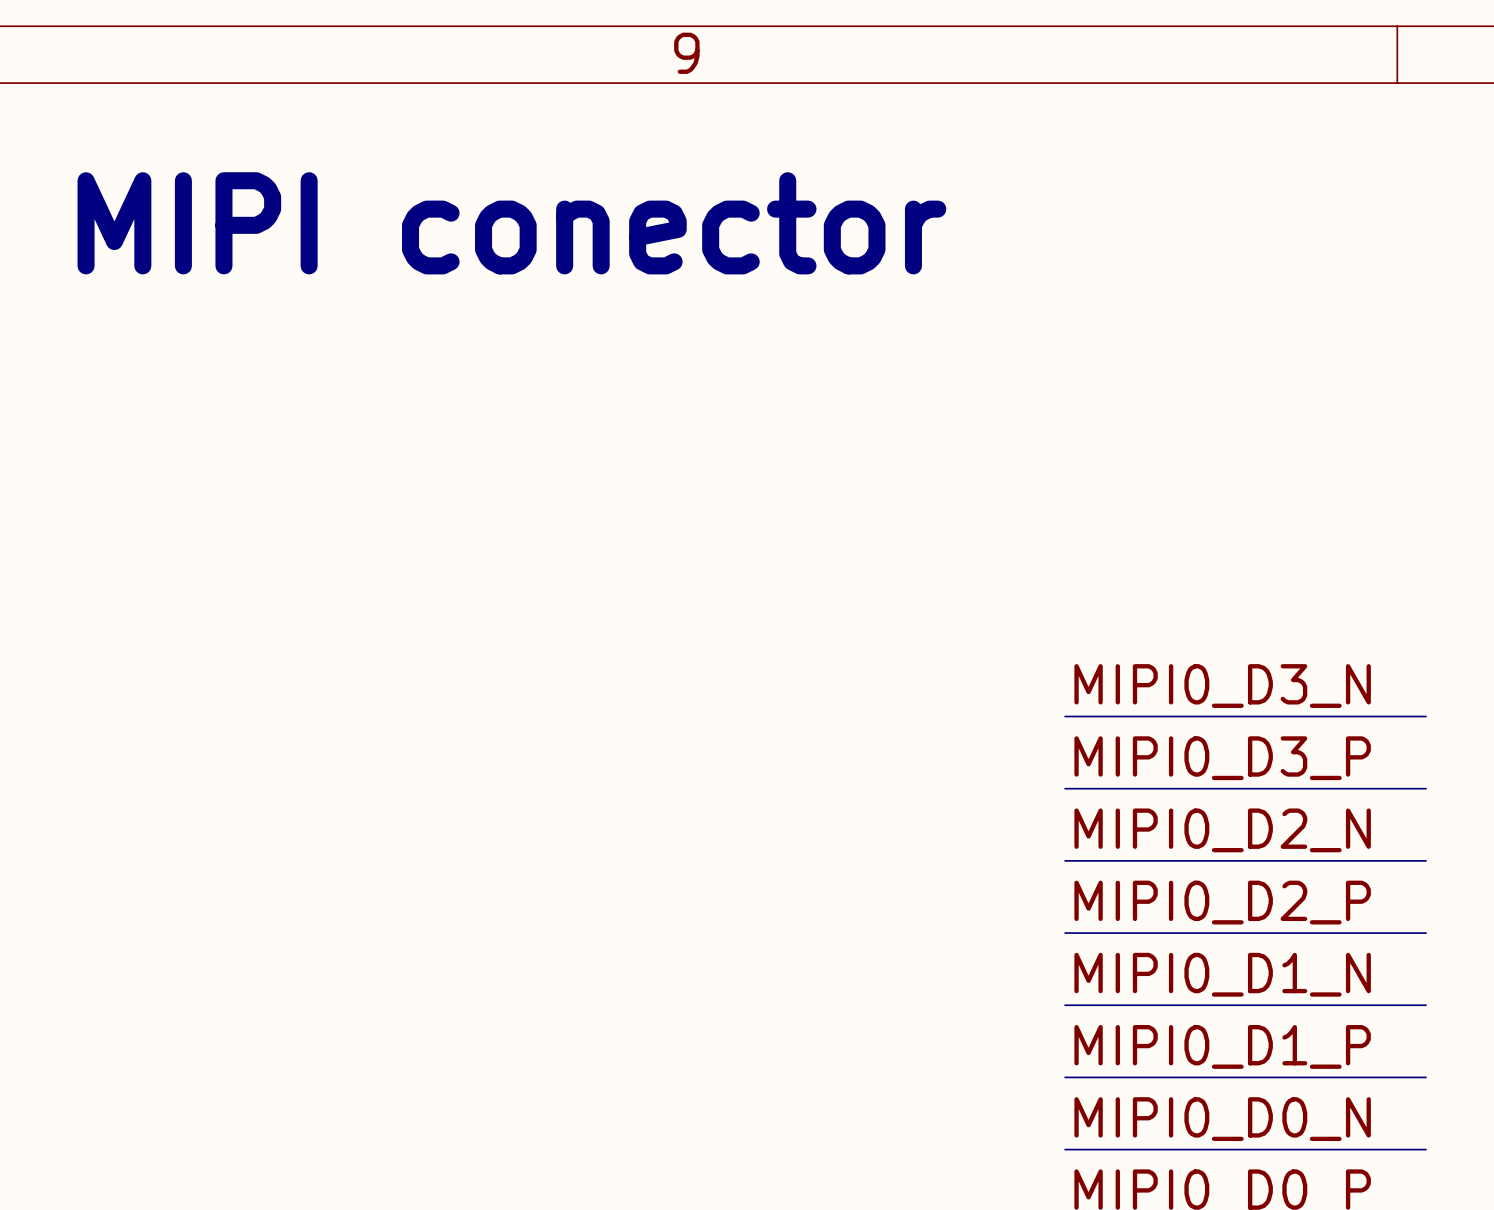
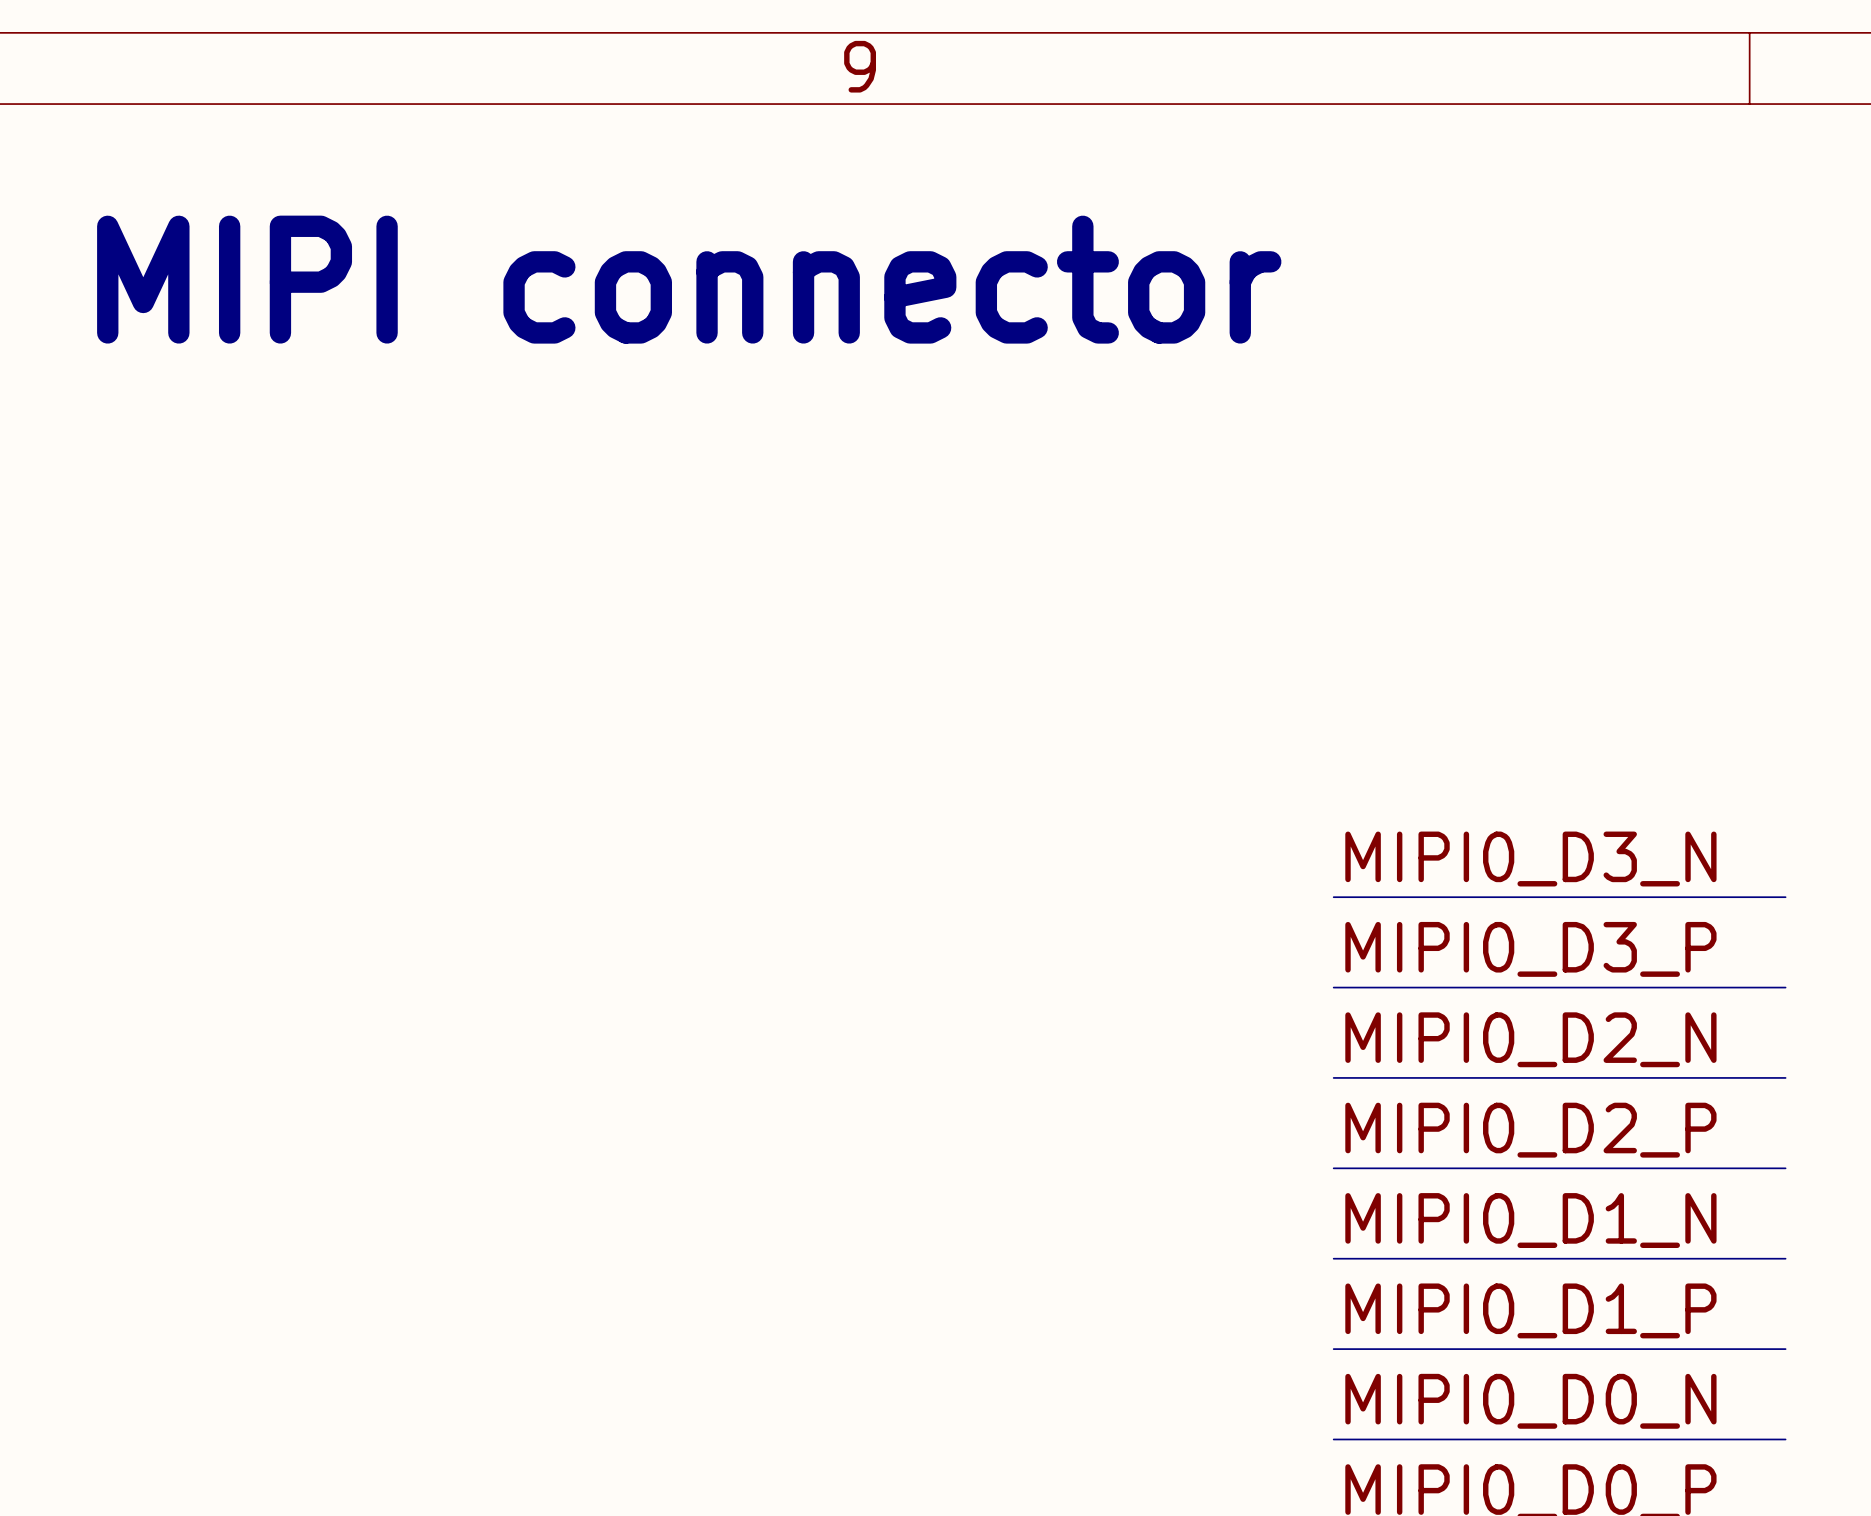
text: MIPI conector (511, 223) -> MIPI connector (689, 279)

